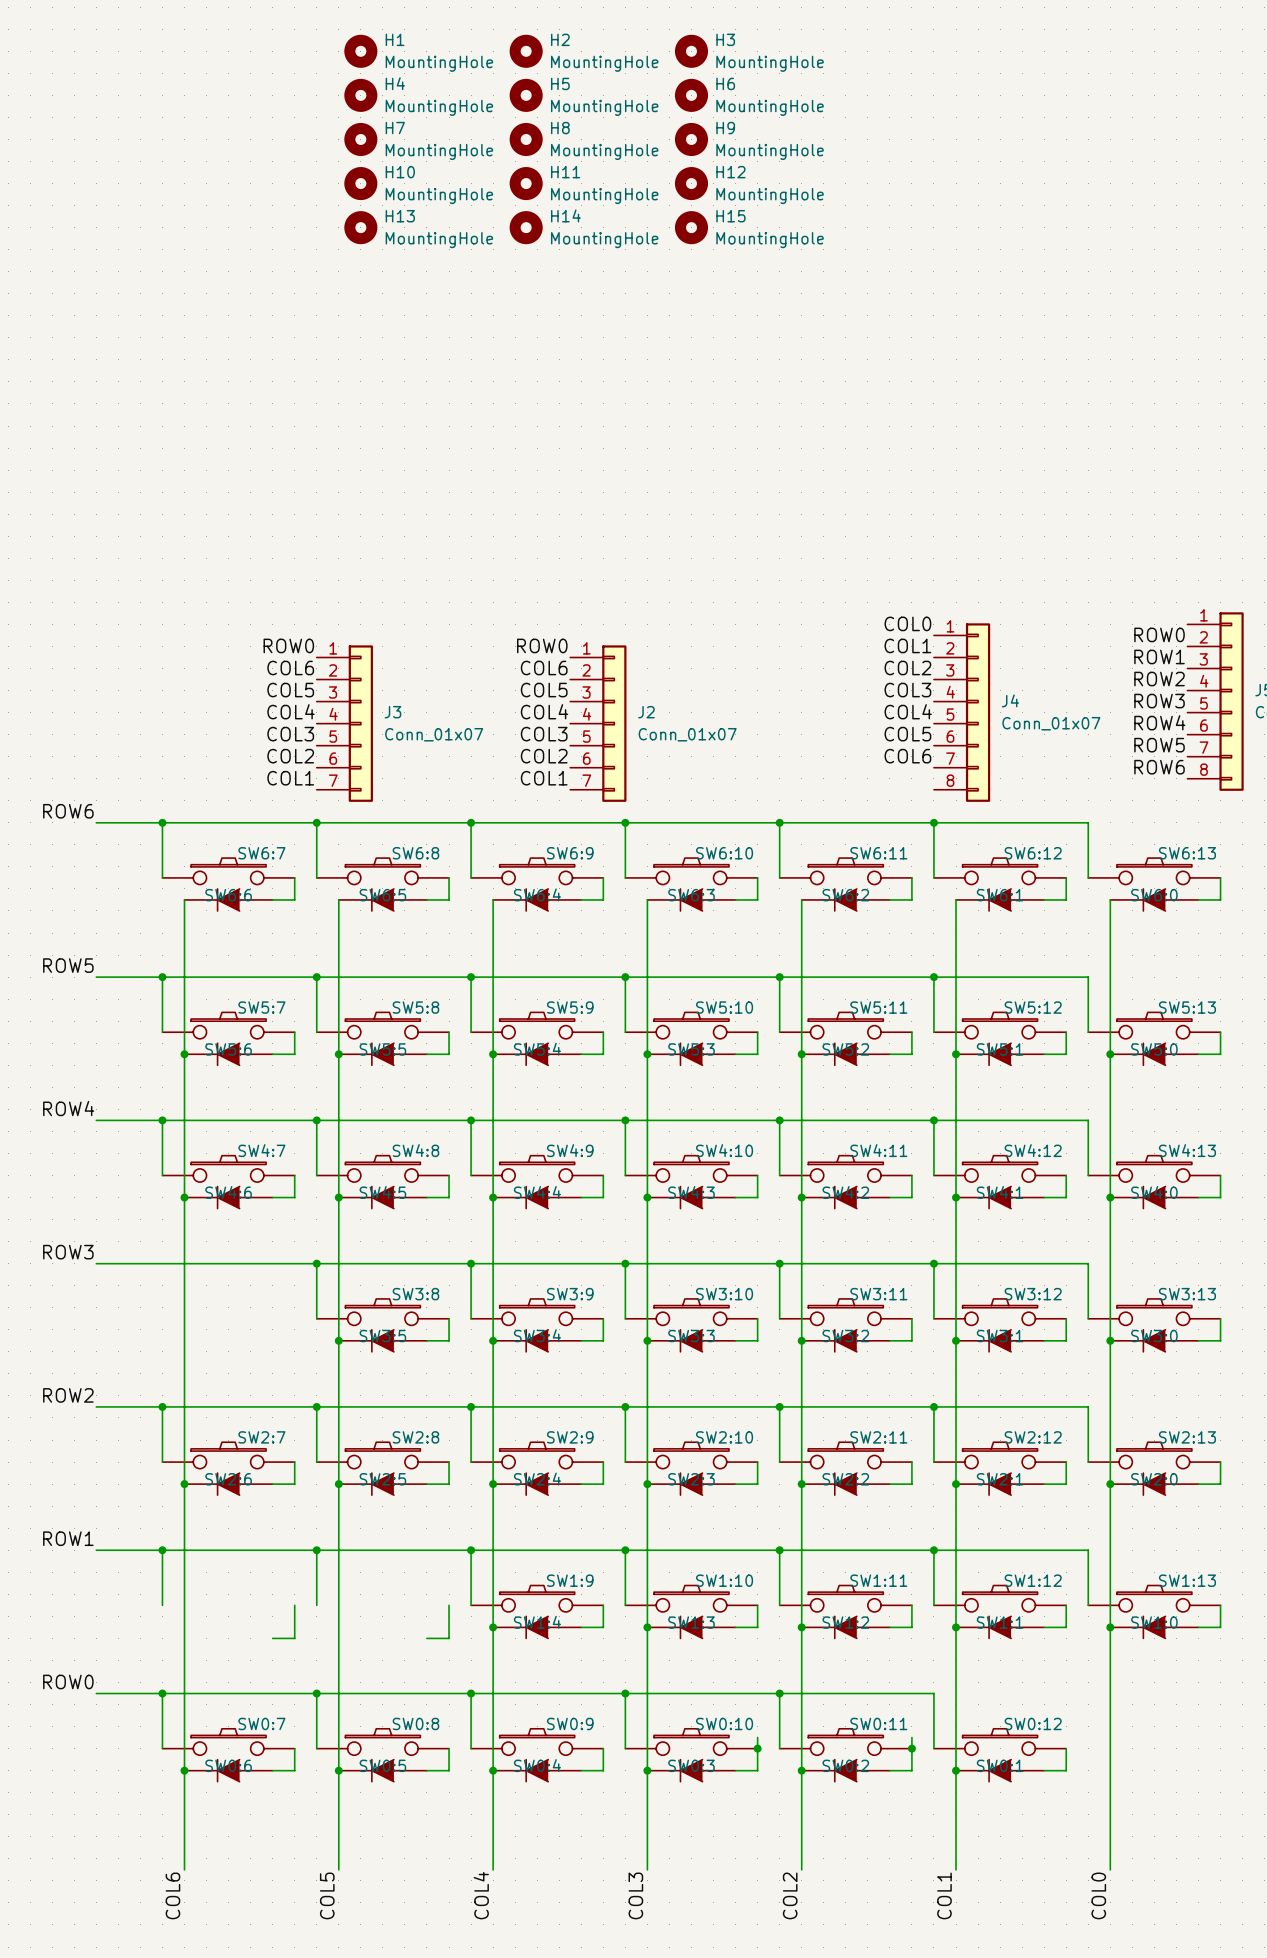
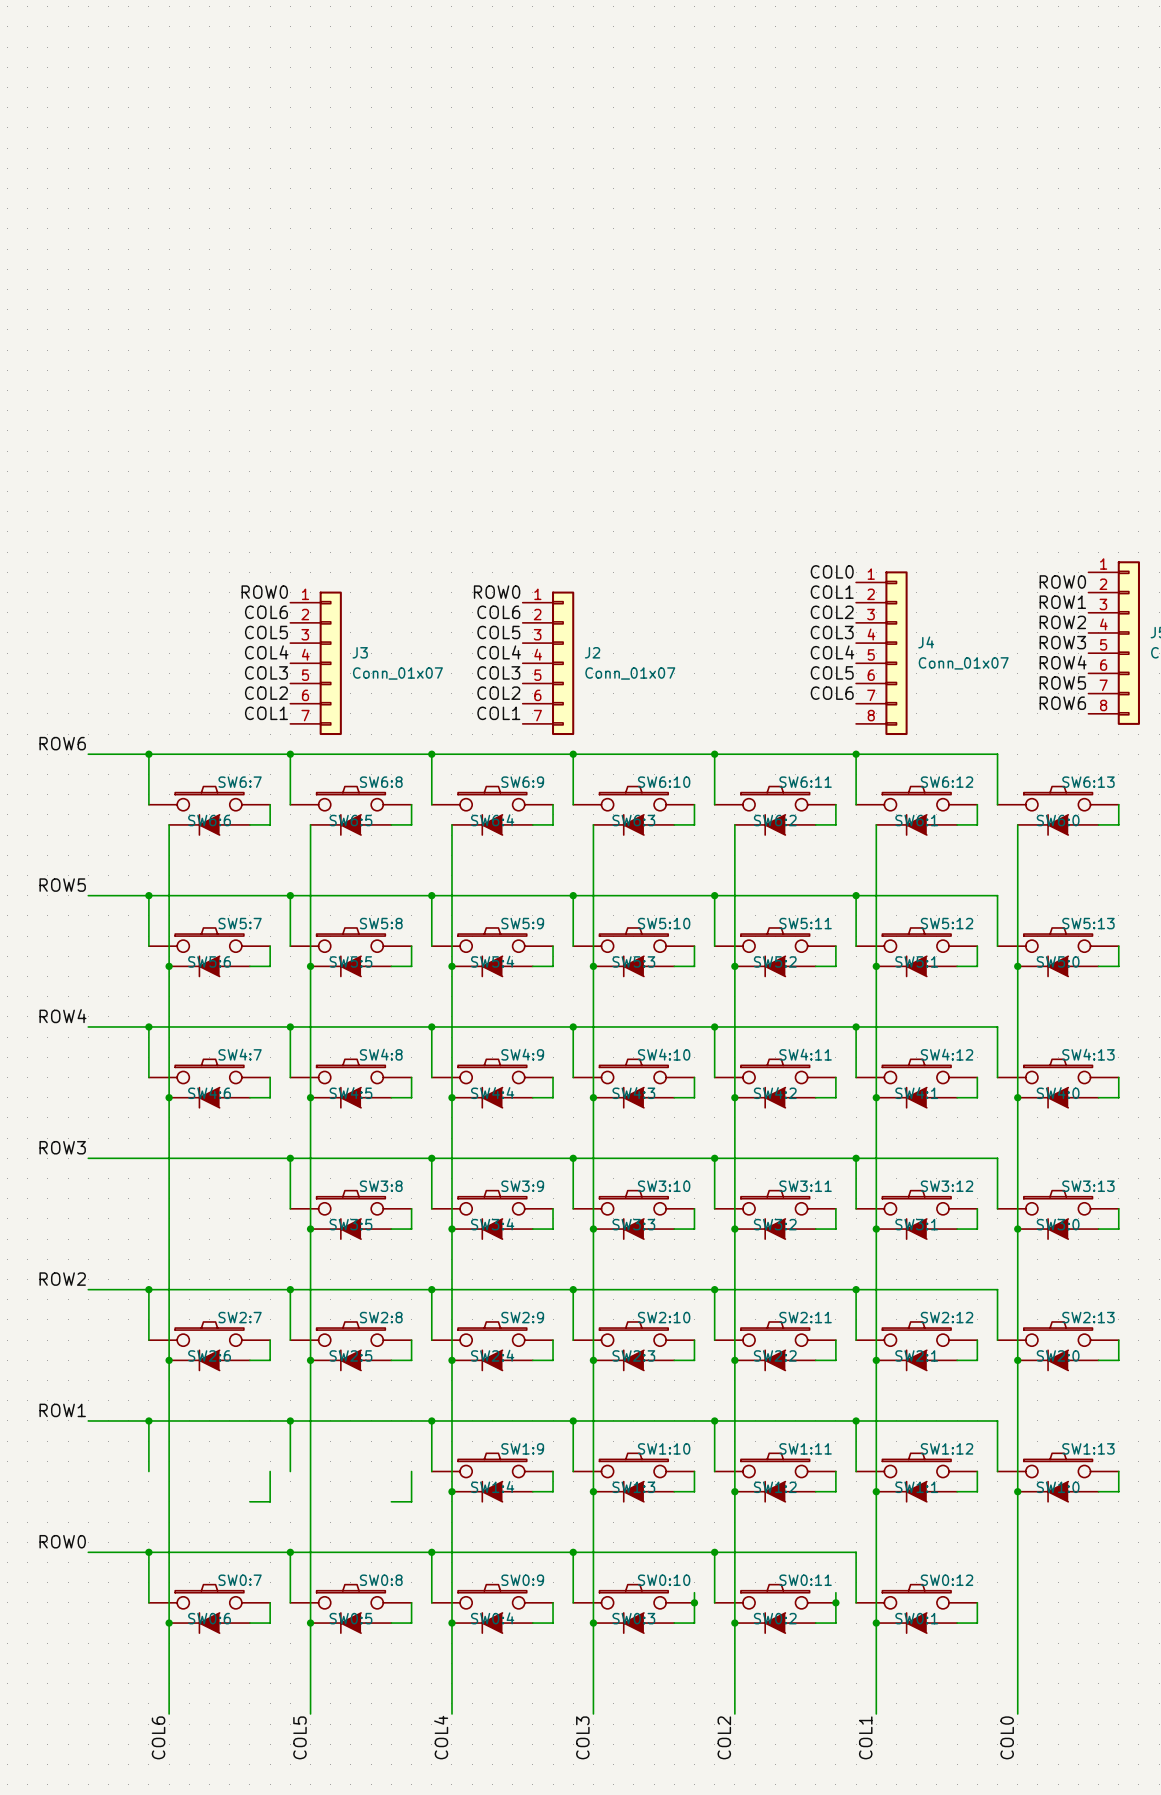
H1: MountingHole (360, 51) -> none
H2: MountingHole (526, 51) -> none
H3: MountingHole (691, 51) -> none
H4: MountingHole (360, 95) -> none
H5: MountingHole (526, 95) -> none
H6: MountingHole (691, 95) -> none
H7: MountingHole (360, 139) -> none
H8: MountingHole (526, 139) -> none
H9: MountingHole (691, 139) -> none
H10: MountingHole (360, 183) -> none
H11: MountingHole (526, 183) -> none
H12: MountingHole (691, 183) -> none
H13: MountingHole (360, 227) -> none
H14: MountingHole (526, 227) -> none
H15: MountingHole (691, 227) -> none

